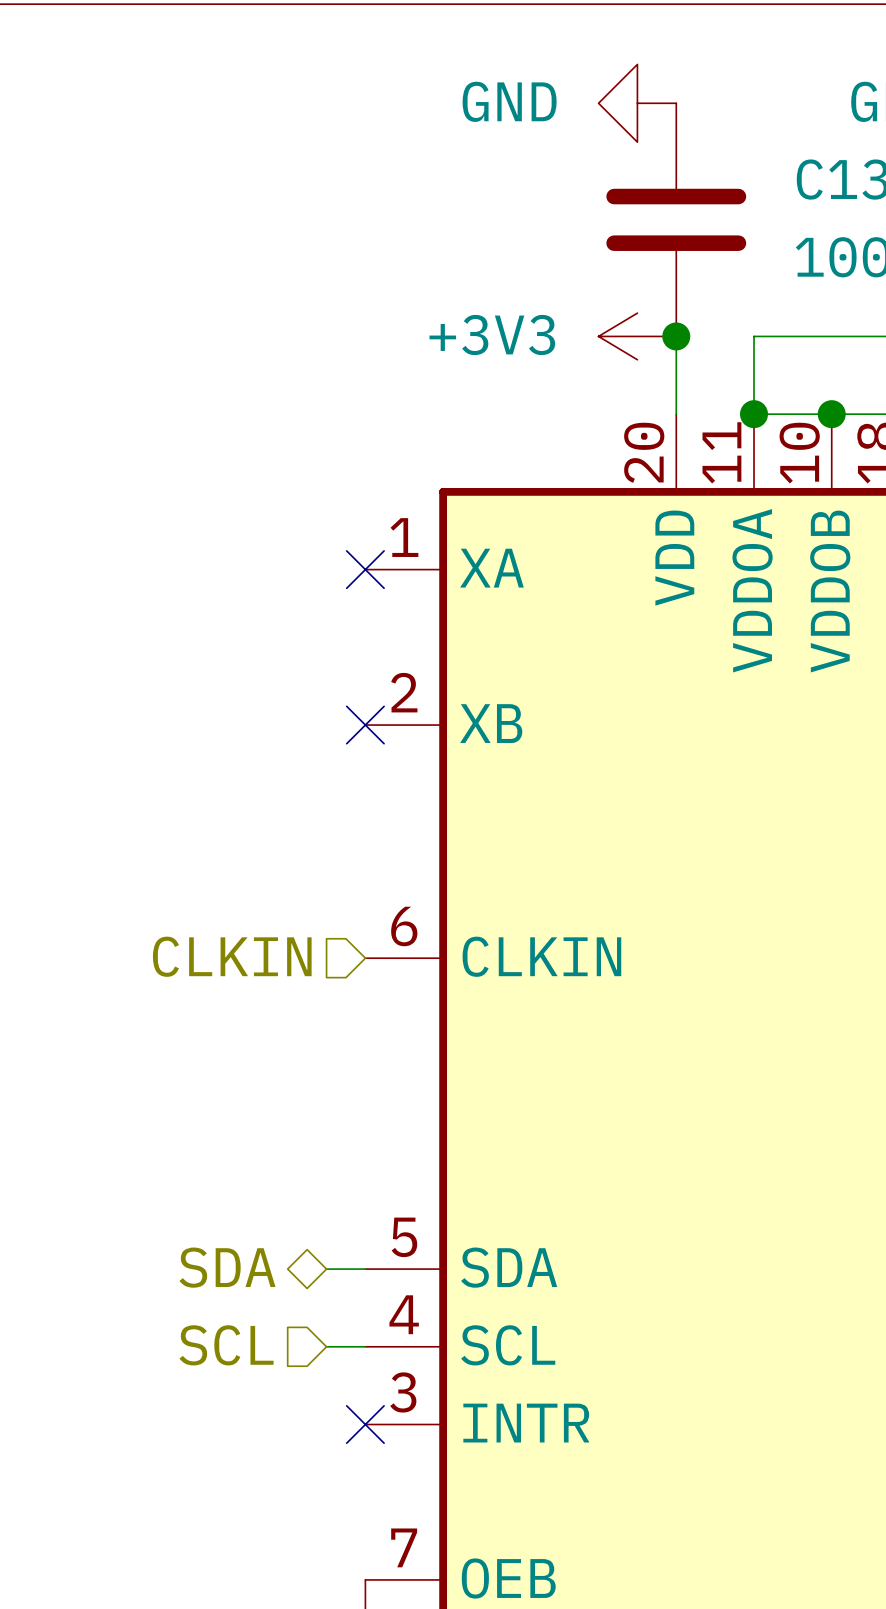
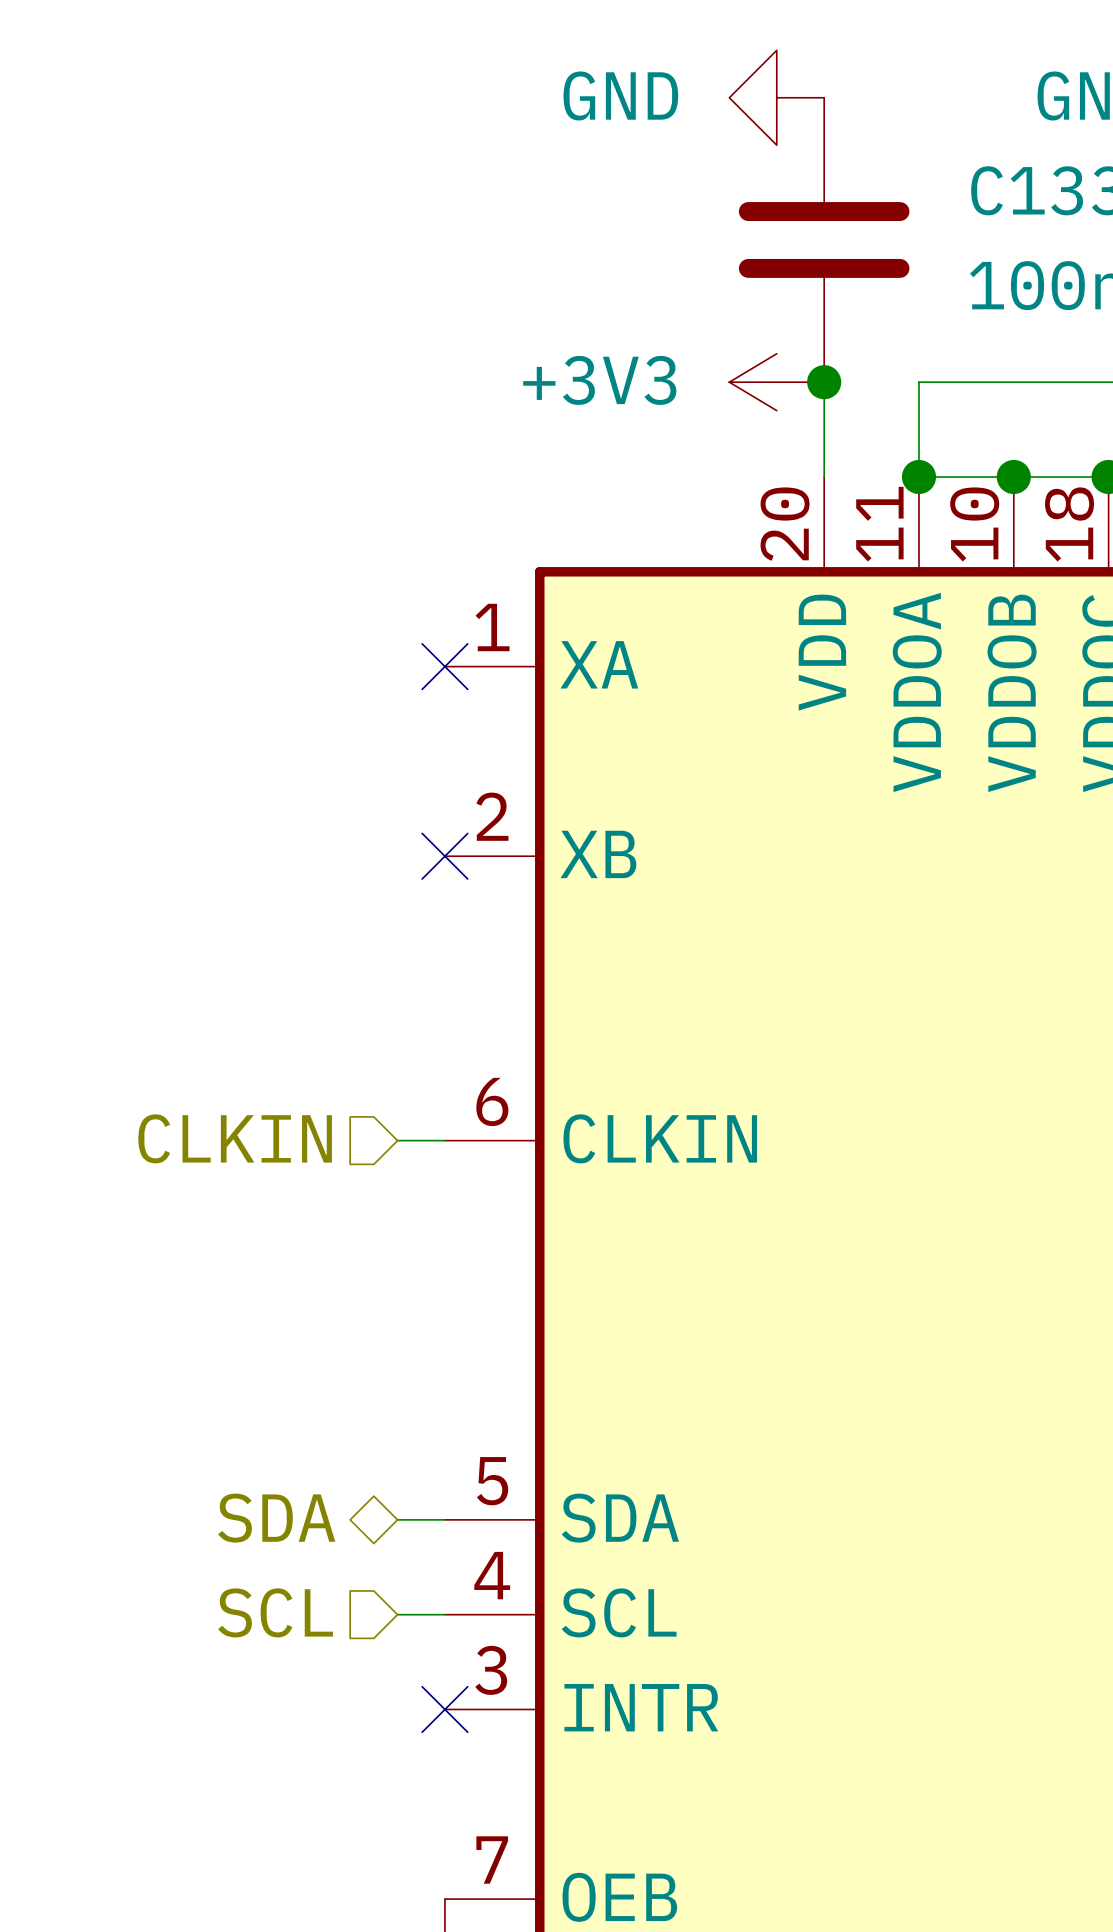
hierarchical label position: CLKIN (232, 956) -> CLKIN (235, 1138)
wire: none -> (397, 1140) (444, 1140)

